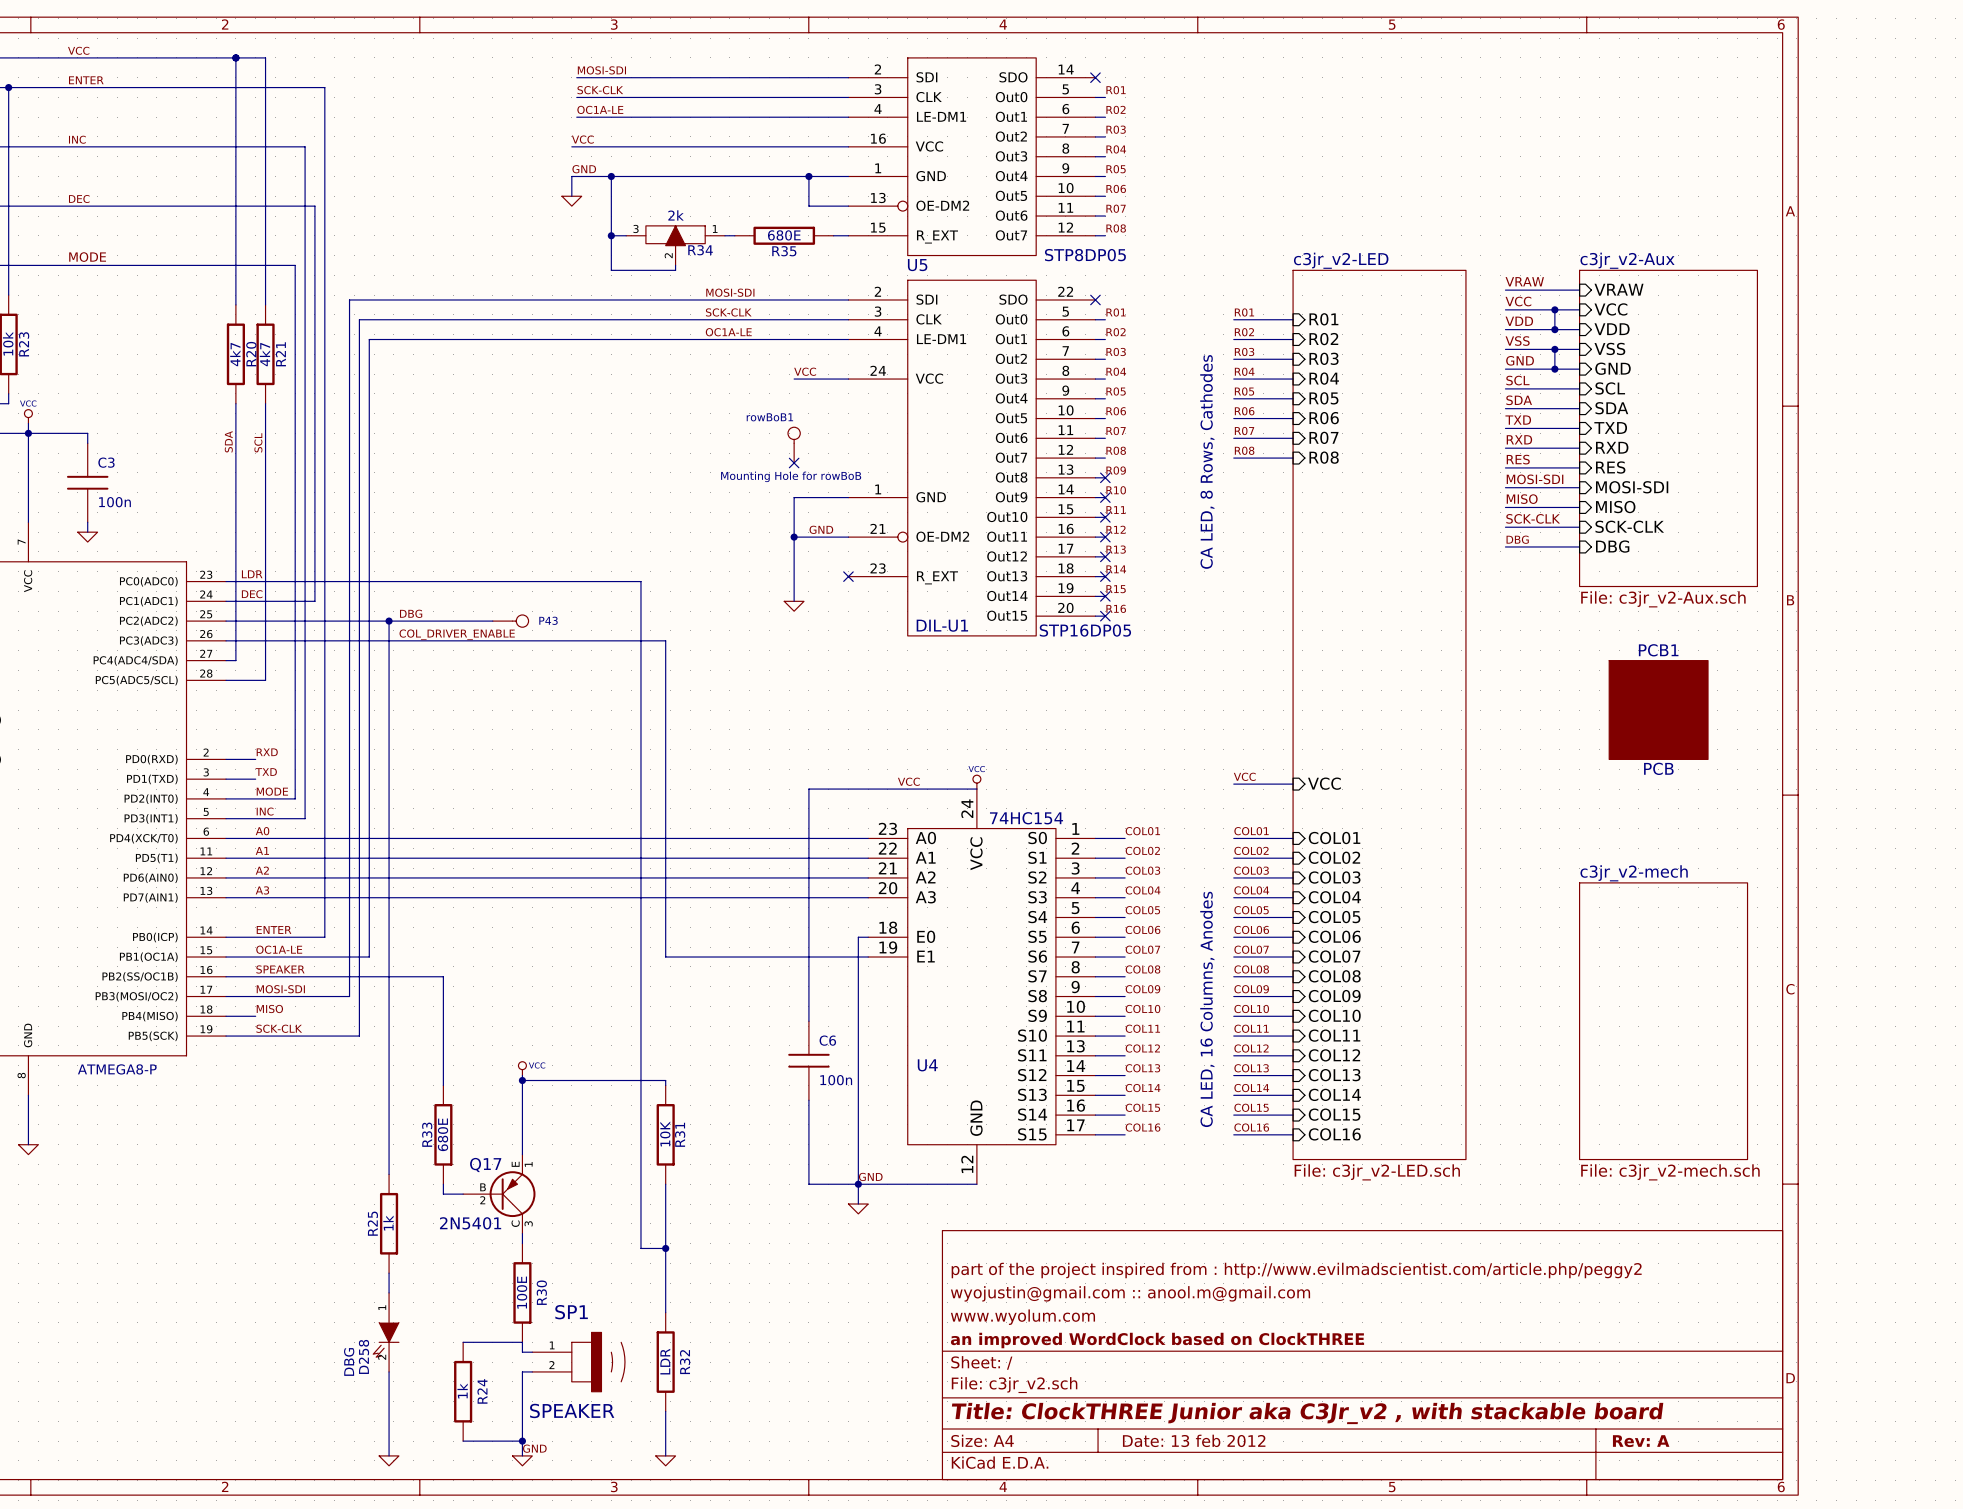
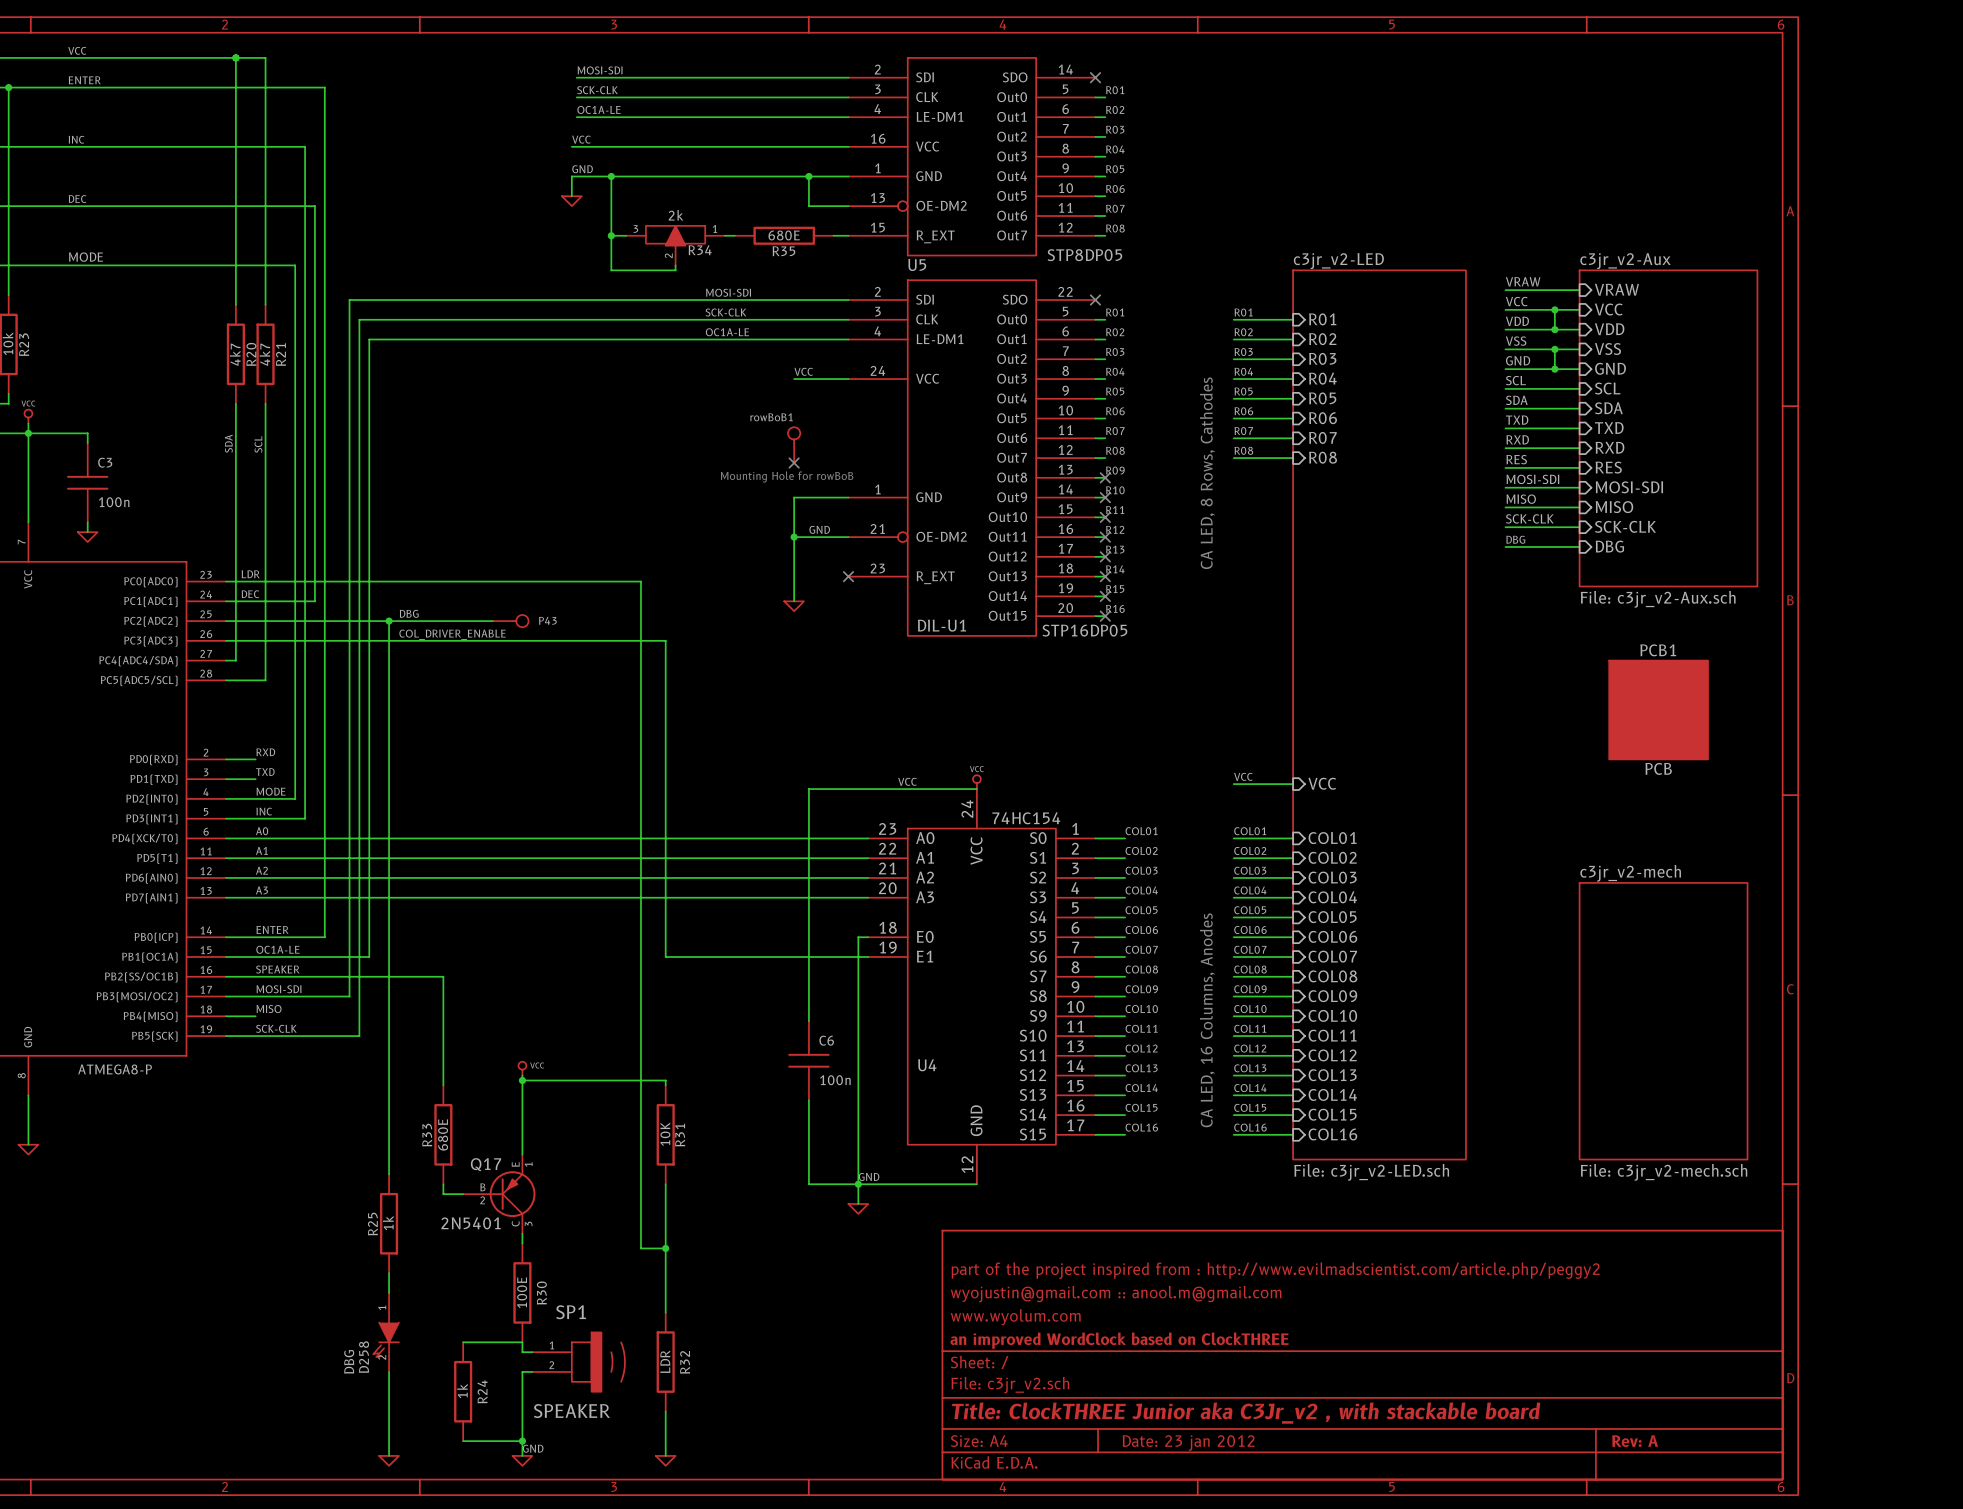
title block: Date: 13 feb 2012 (1194, 1440) -> Date: 23 jan 2012 (1188, 1442)

